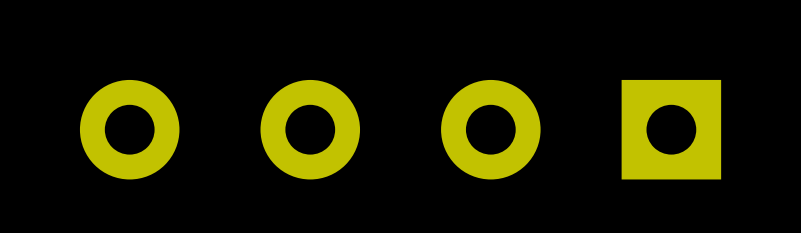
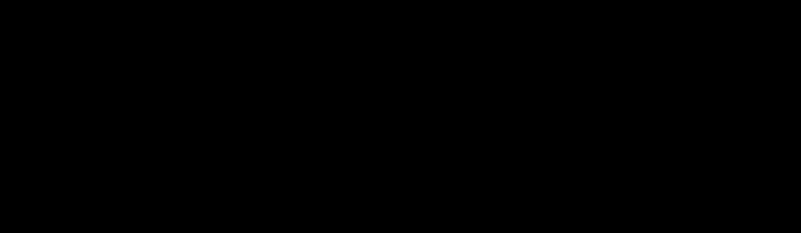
part: (400, 129) -> none

